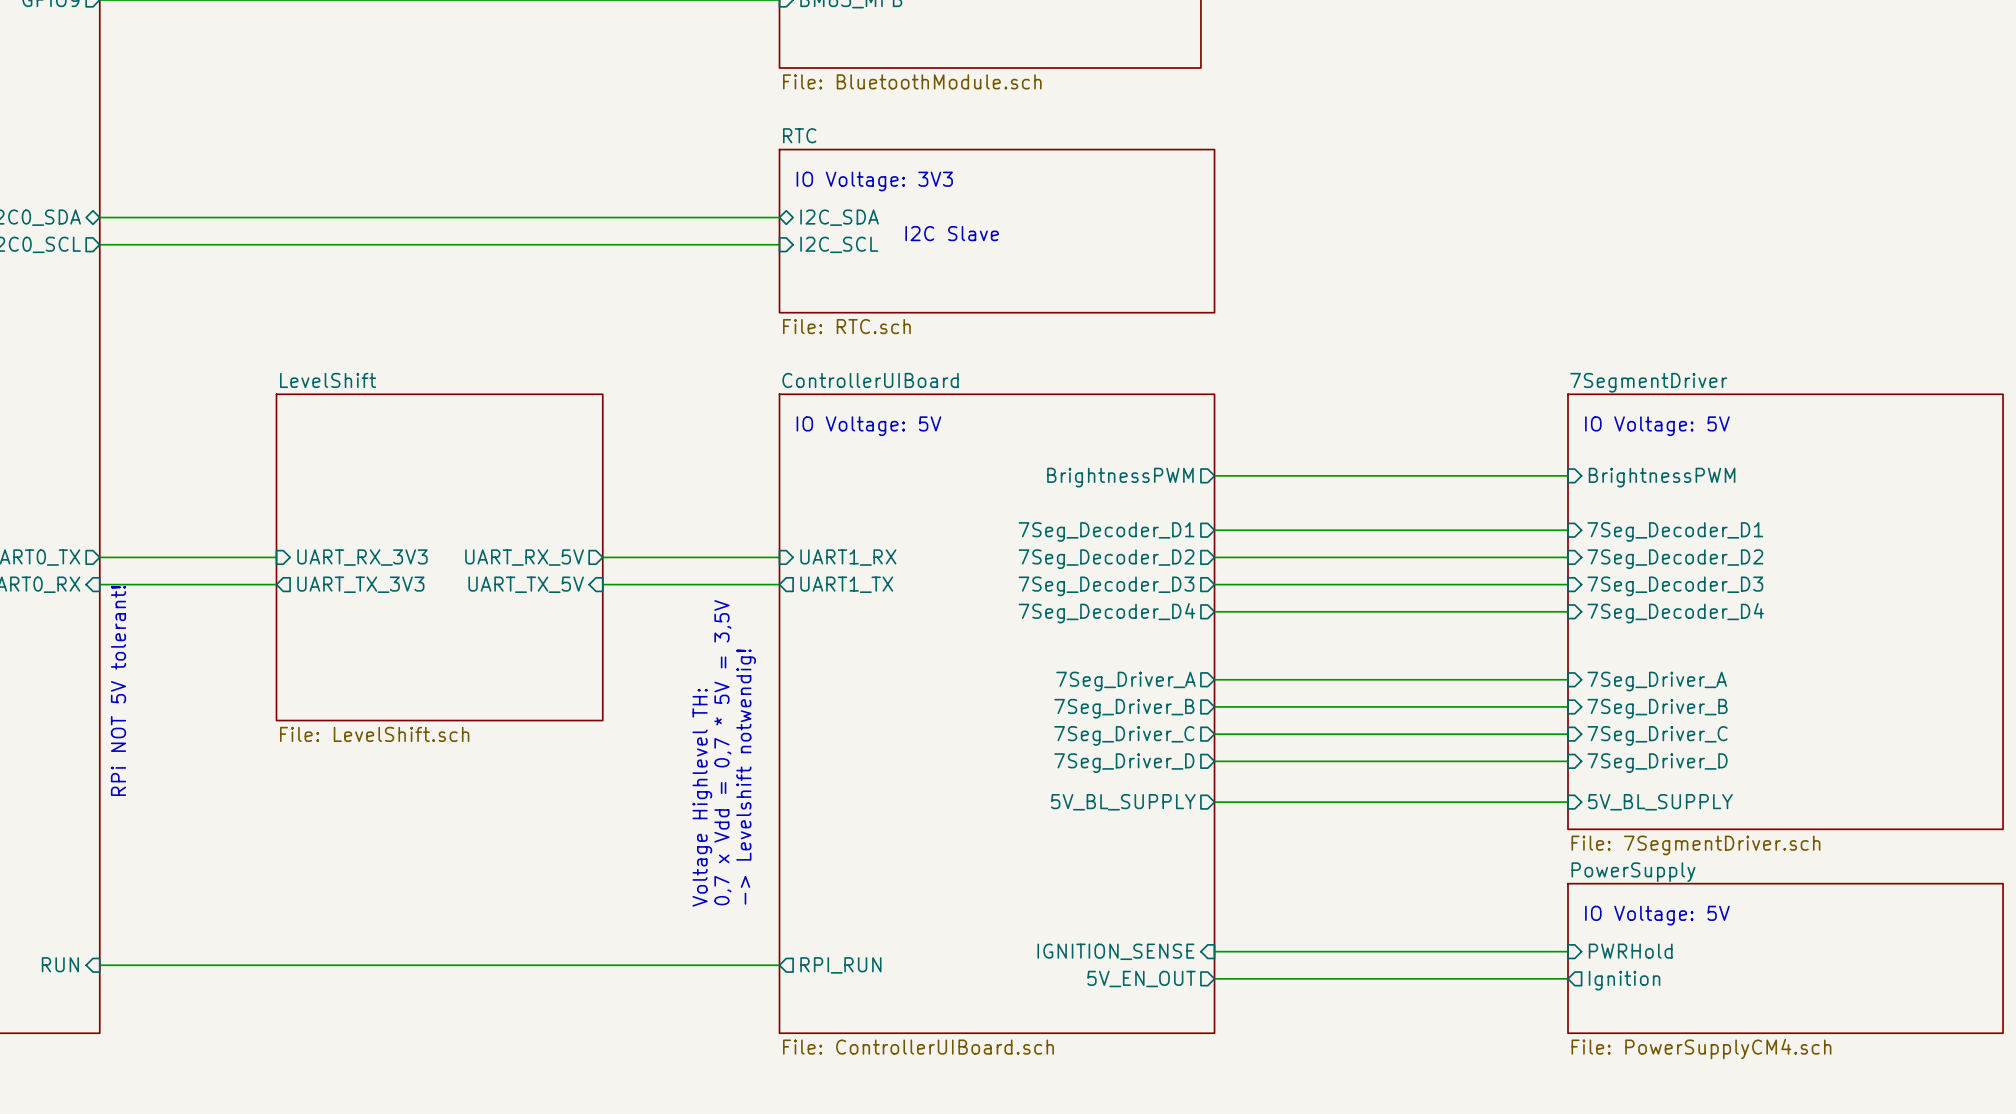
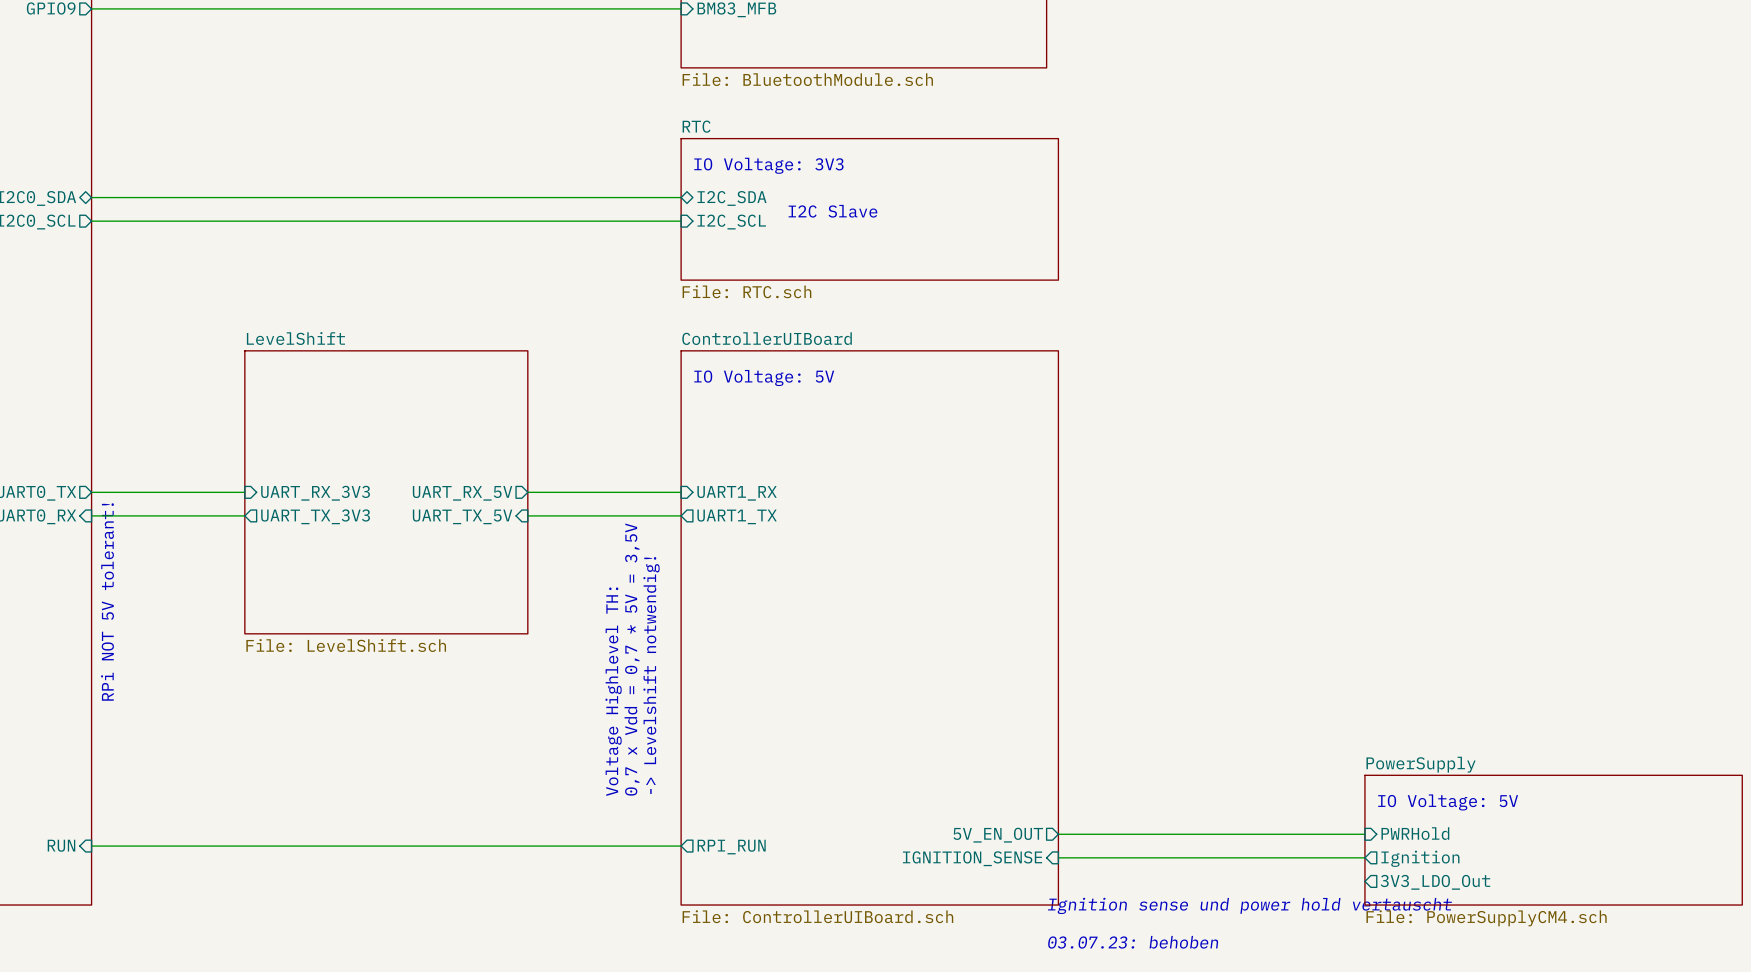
text: IO Voltage: 5V (1657, 426) -> none
wire: (1214, 475) (1568, 475) -> none
sheet pin: BrightnessPWM (1120, 477) -> none
sheet pin: BrightnessPWM (1662, 477) -> none
wire: (1214, 530) (1568, 530) -> none
sheet pin: 7Seg_Decoder_D1 (1106, 531) -> none
sheet pin: 7Seg_Decoder_D1 (1675, 531) -> none
wire: (1214, 557) (1568, 557) -> none
sheet pin: 7Seg_Decoder_D2 (1106, 559) -> none
sheet pin: 7Seg_Decoder_D2 (1675, 559) -> none
wire: (1214, 584) (1568, 584) -> none
sheet pin: 7Seg_Decoder_D3 (1106, 586) -> none
sheet pin: 7Seg_Decoder_D3 (1675, 586) -> none
wire: (1214, 611) (1568, 611) -> none
sheet 7SegmentDriver: File: 7SegmentDriver.sch (1785, 611) -> none
sheet pin: 7Seg_Decoder_D4 (1106, 613) -> none
sheet pin: 7Seg_Decoder_D4 (1675, 613) -> none
wire: (1214, 679) (1568, 679) -> none
sheet pin: 7Seg_Driver_A (1125, 681) -> none
sheet pin: 7Seg_Driver_A (1657, 681) -> none
wire: (1214, 706) (1568, 706) -> none
sheet pin: 7Seg_Driver_B (1124, 708) -> none
sheet pin: 7Seg_Driver_B (1657, 708) -> none
wire: (1214, 734) (1568, 734) -> none
sheet pin: 7Seg_Driver_C (1124, 735) -> none
sheet pin: 7Seg_Driver_C (1657, 735) -> none
wire: (1214, 761) (1568, 761) -> none
sheet pin: 7Seg_Driver_D (1124, 763) -> none
sheet pin: 7Seg_Driver_D (1657, 763) -> none
sheet pin: 5V_BL_SUPPLY (1123, 802) -> none
wire: (1214, 802) (1568, 802) -> none
sheet pin: 5V_BL_SUPPLY (1660, 802) -> none
sheet pin shape: input (1115, 951) -> output (998, 835)
sheet pin: IGNITION_SENSE (1115, 951) -> 5V_EN_OUT (998, 835)
sheet pin shape: output (1141, 978) -> input (972, 858)
sheet pin: 5V_EN_OUT (1141, 978) -> IGNITION_SENSE (972, 858)
sheet pin: none -> 3V3_LDO_Out (1435, 882)
text: none -> Ignition sense und power hold vertauscht (1249, 905)
text: none -> 03.07.23: behoben (1133, 942)

